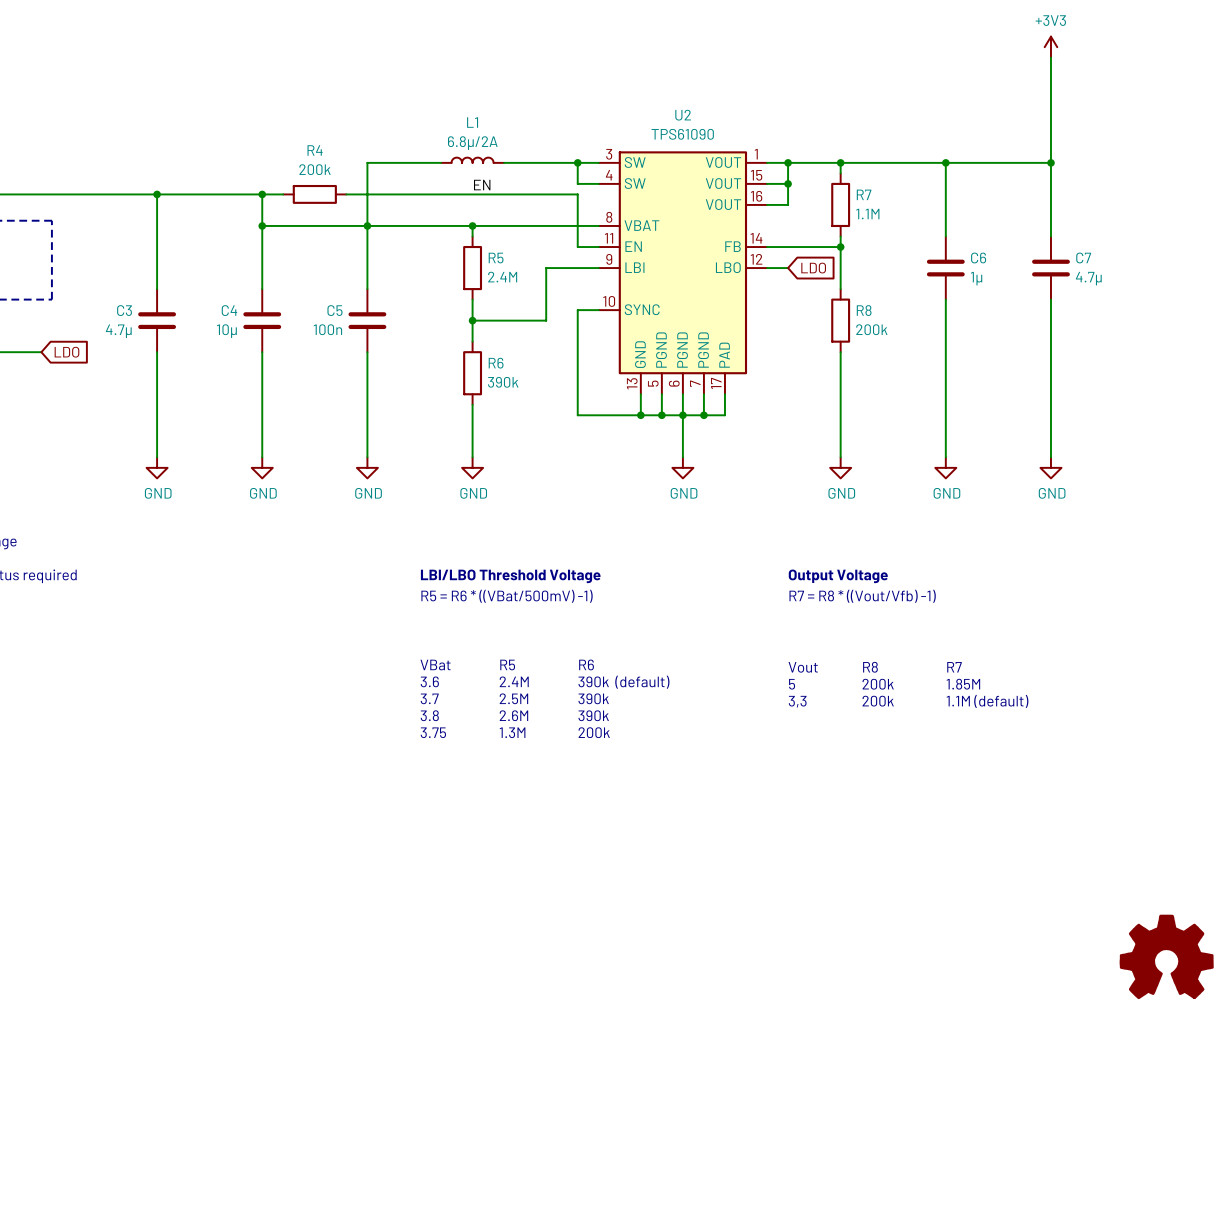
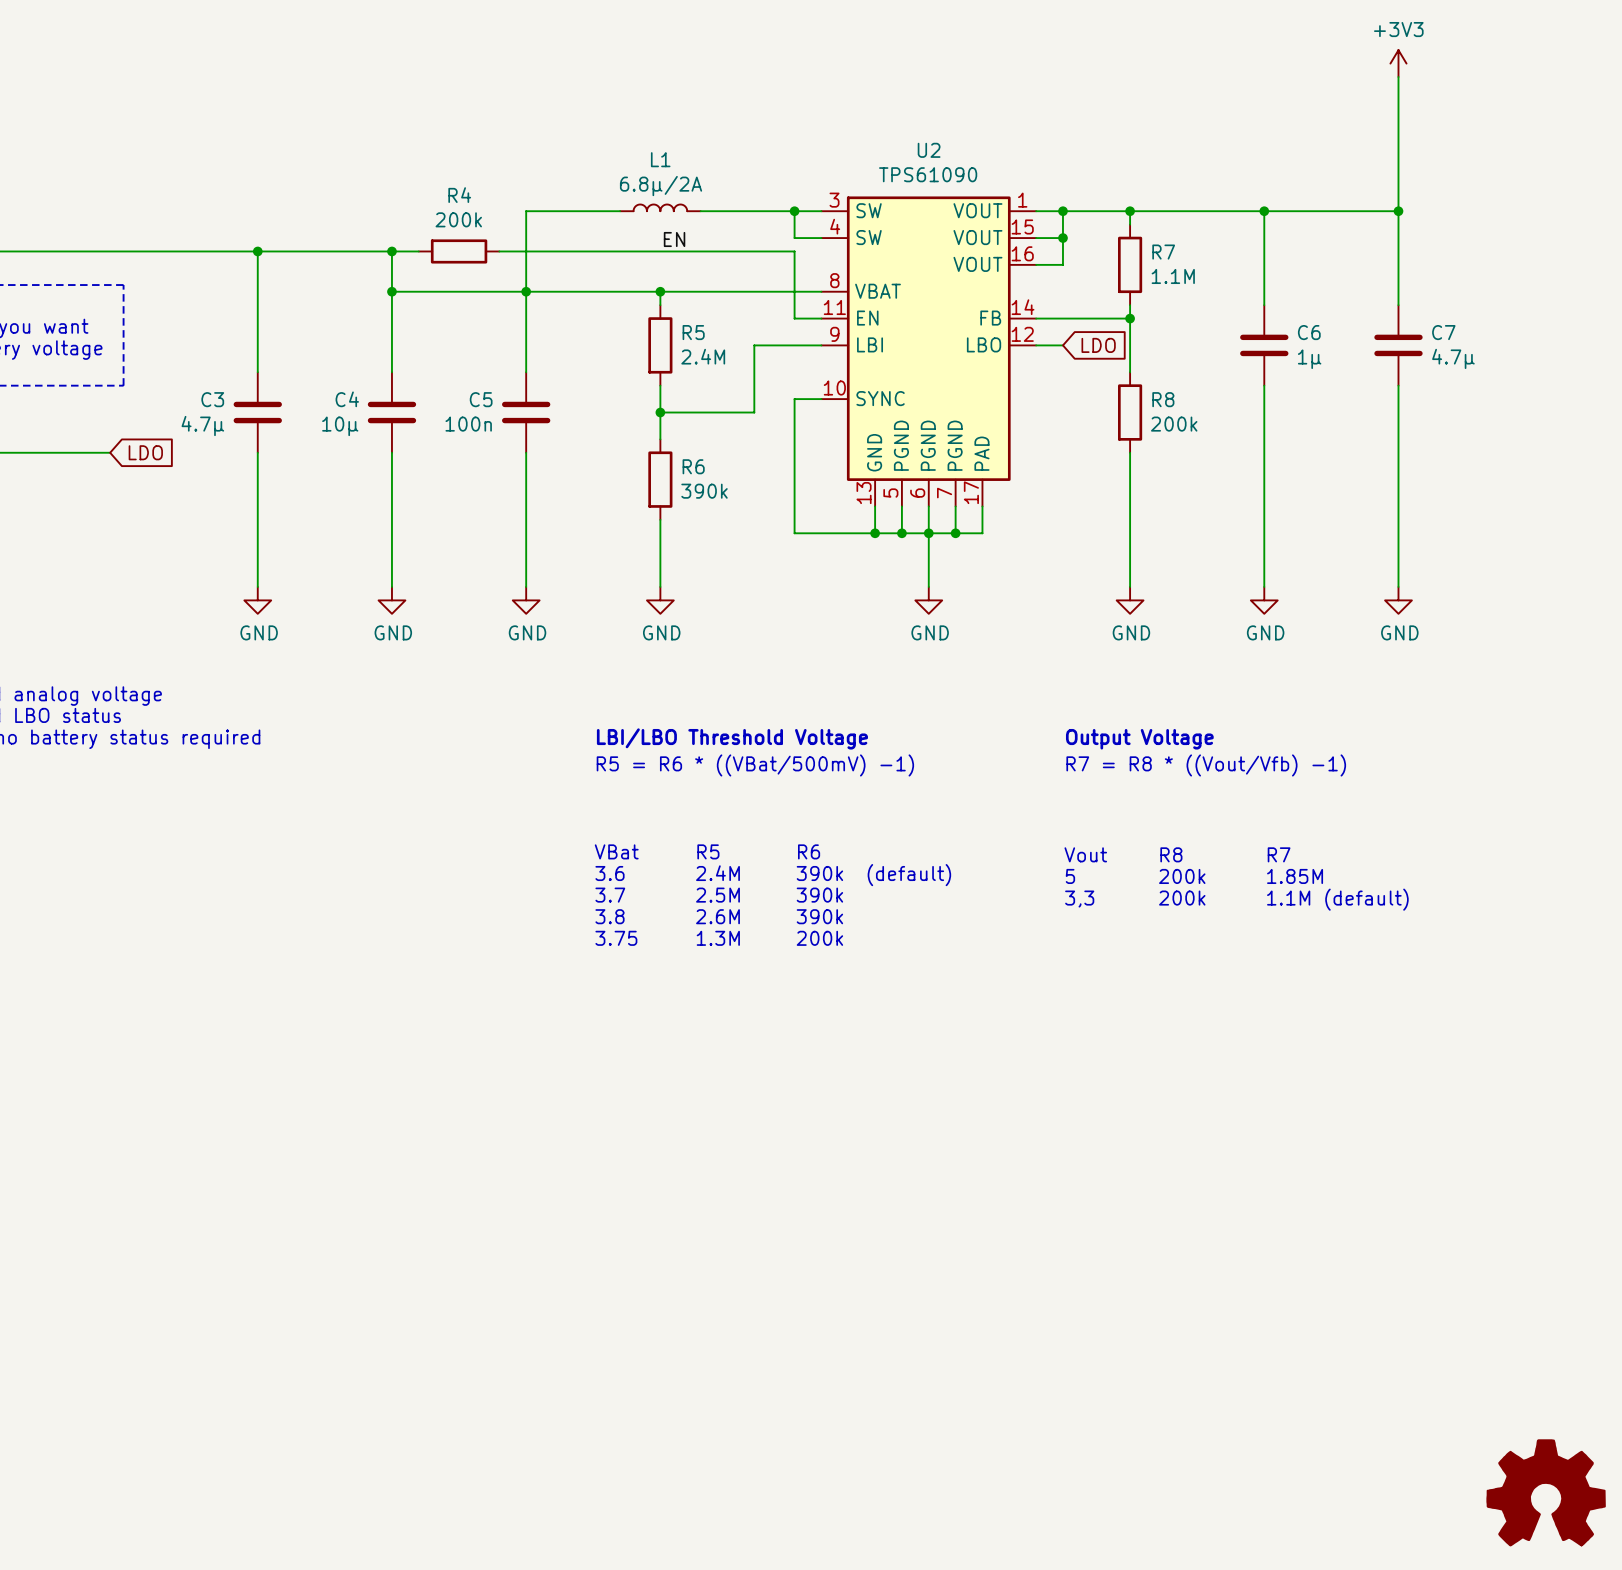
power symbol: (1166, 956) -> none
power symbol: none -> (1546, 1492)

